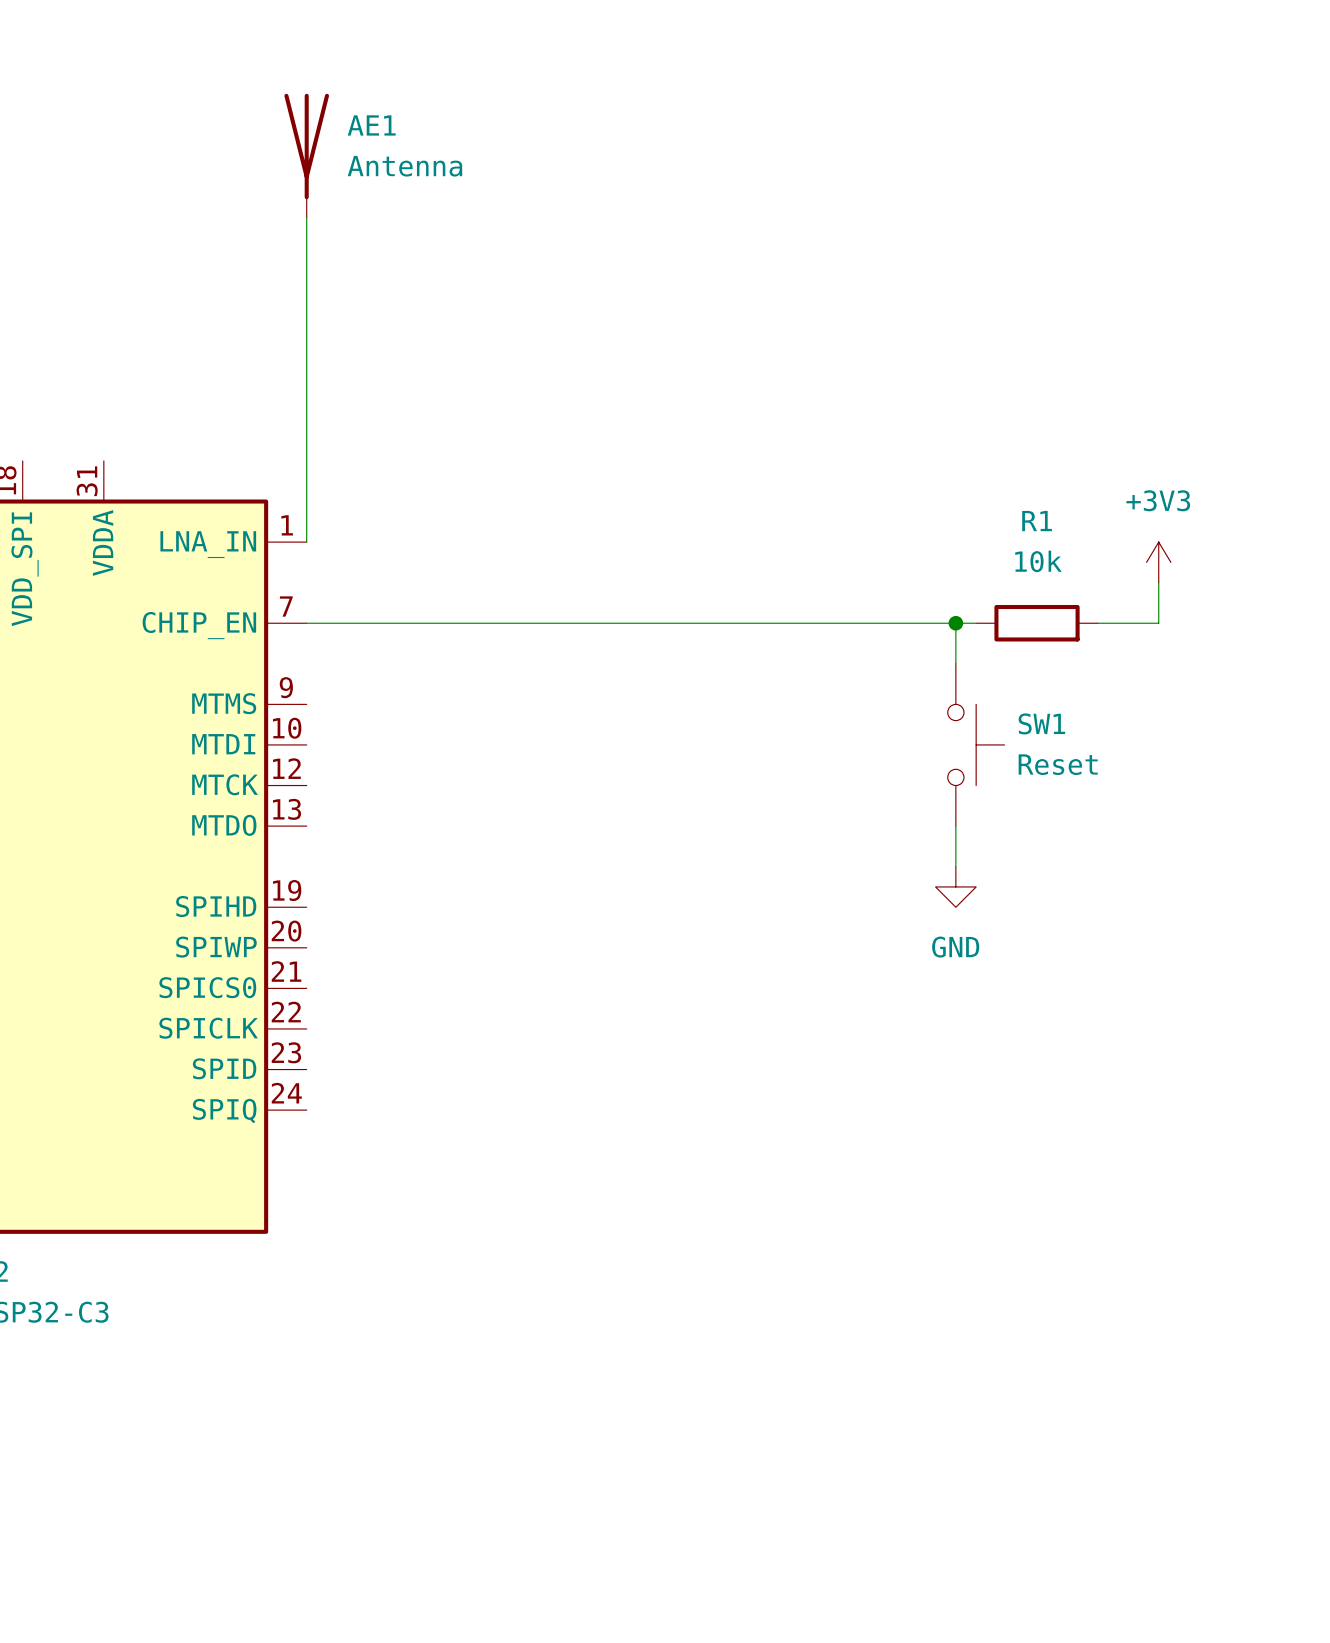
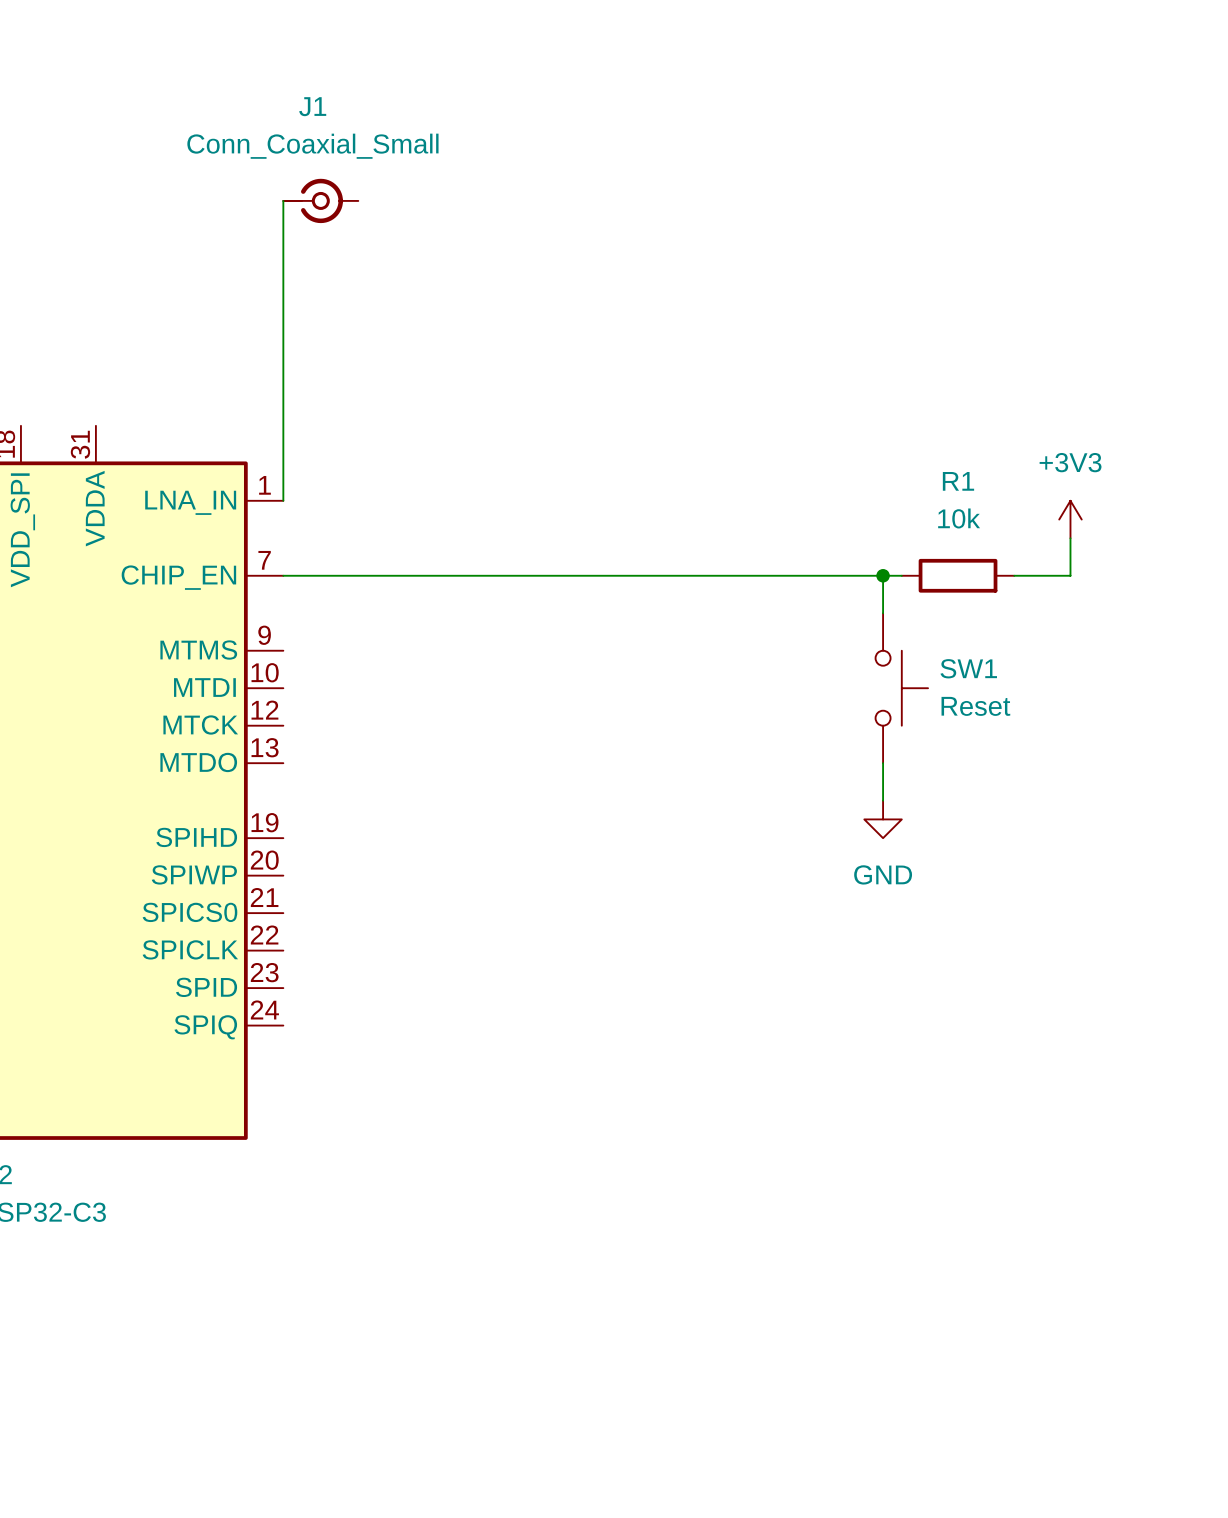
AE1: Antenna (306, 155) -> none
J1: none -> Conn_Coaxial_Small (320, 200)

